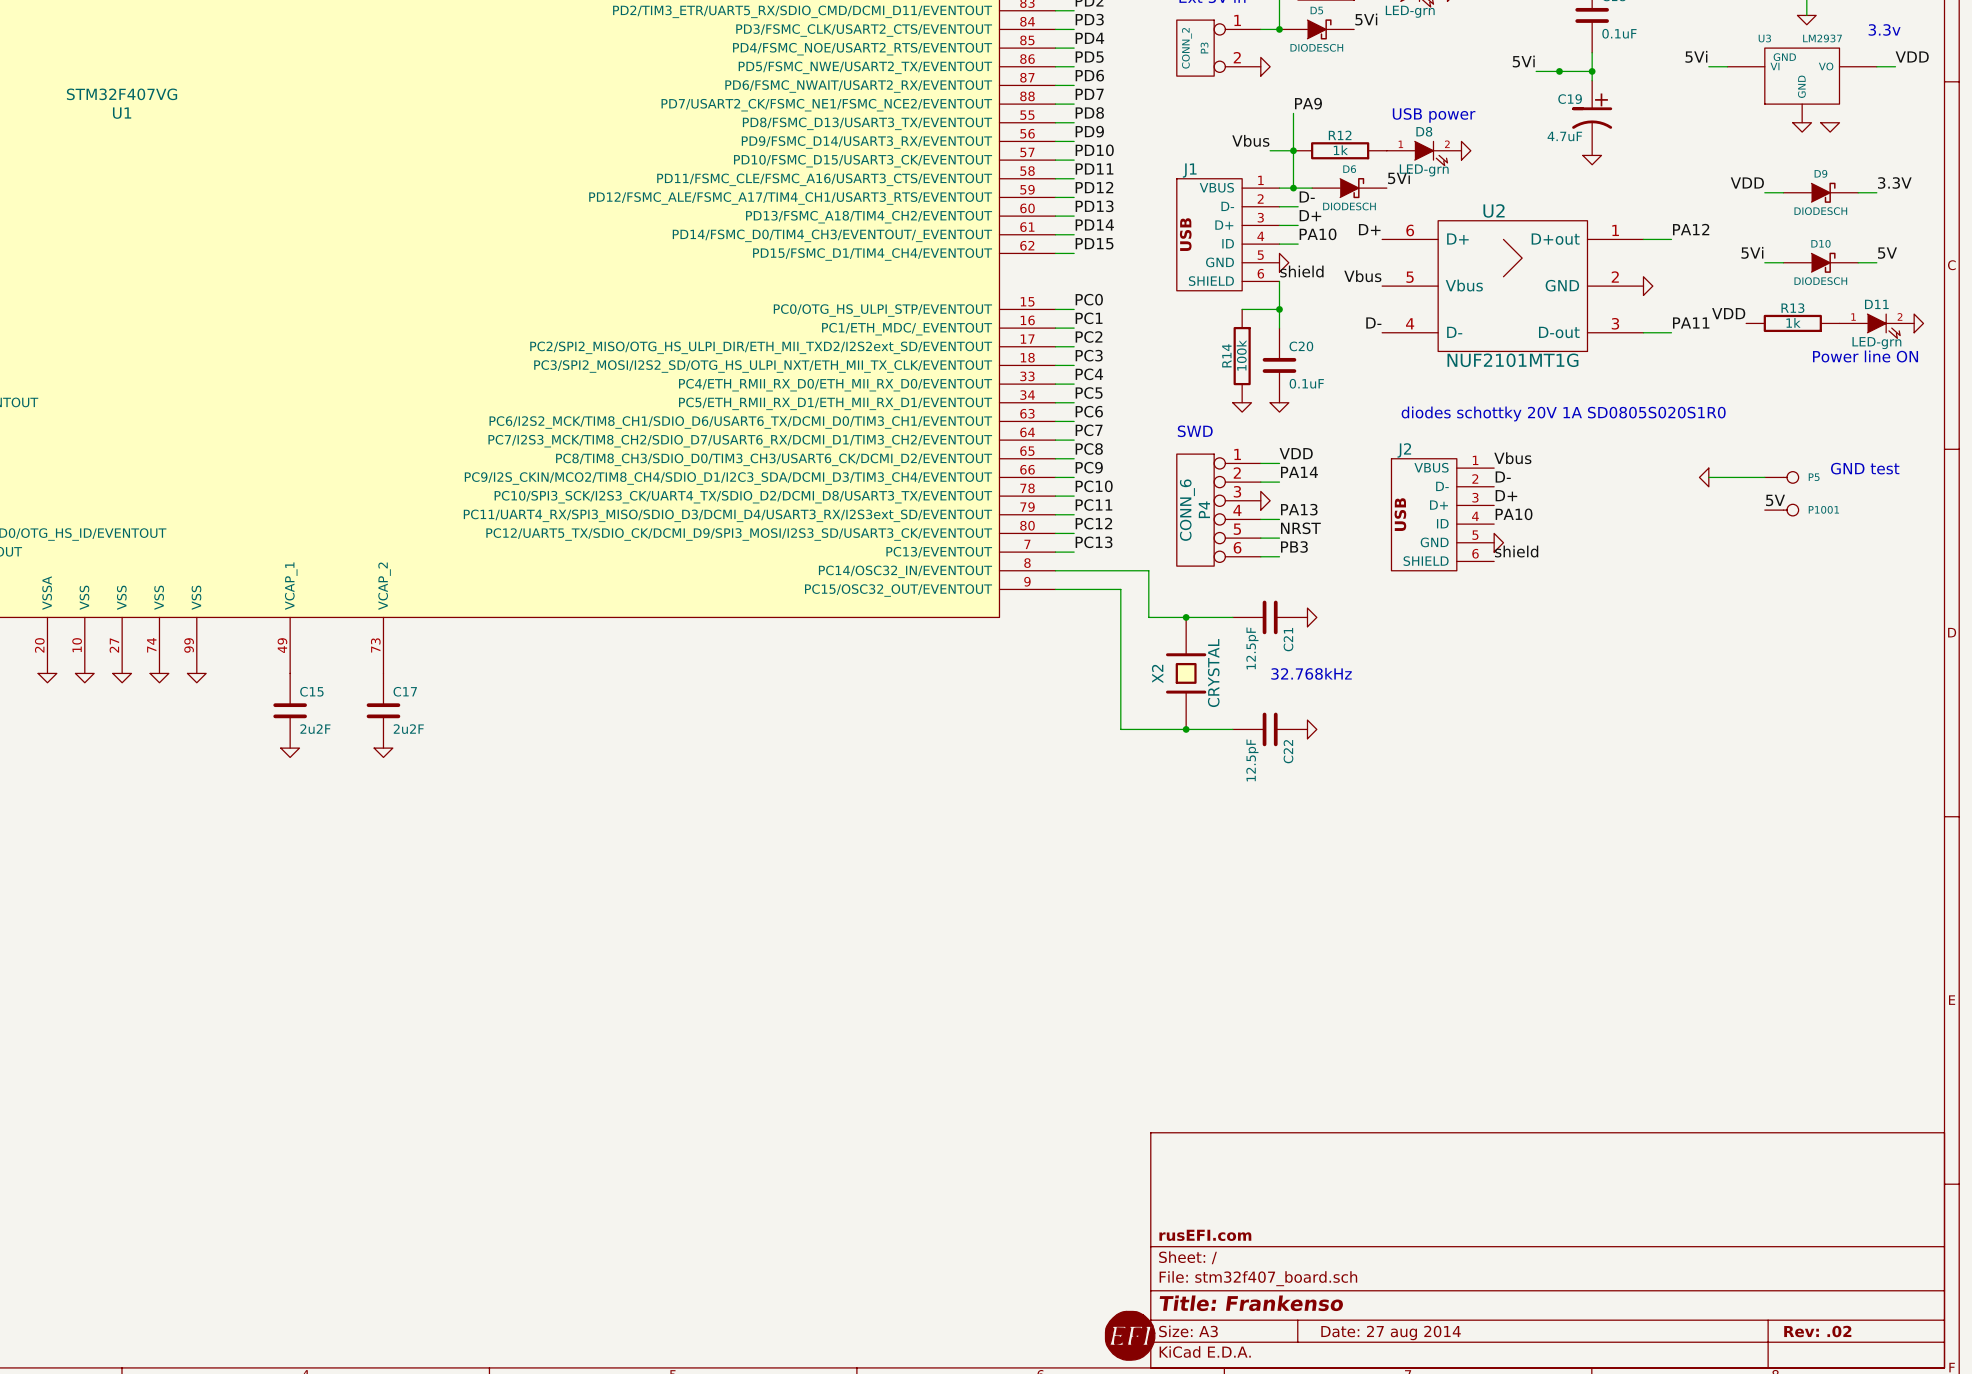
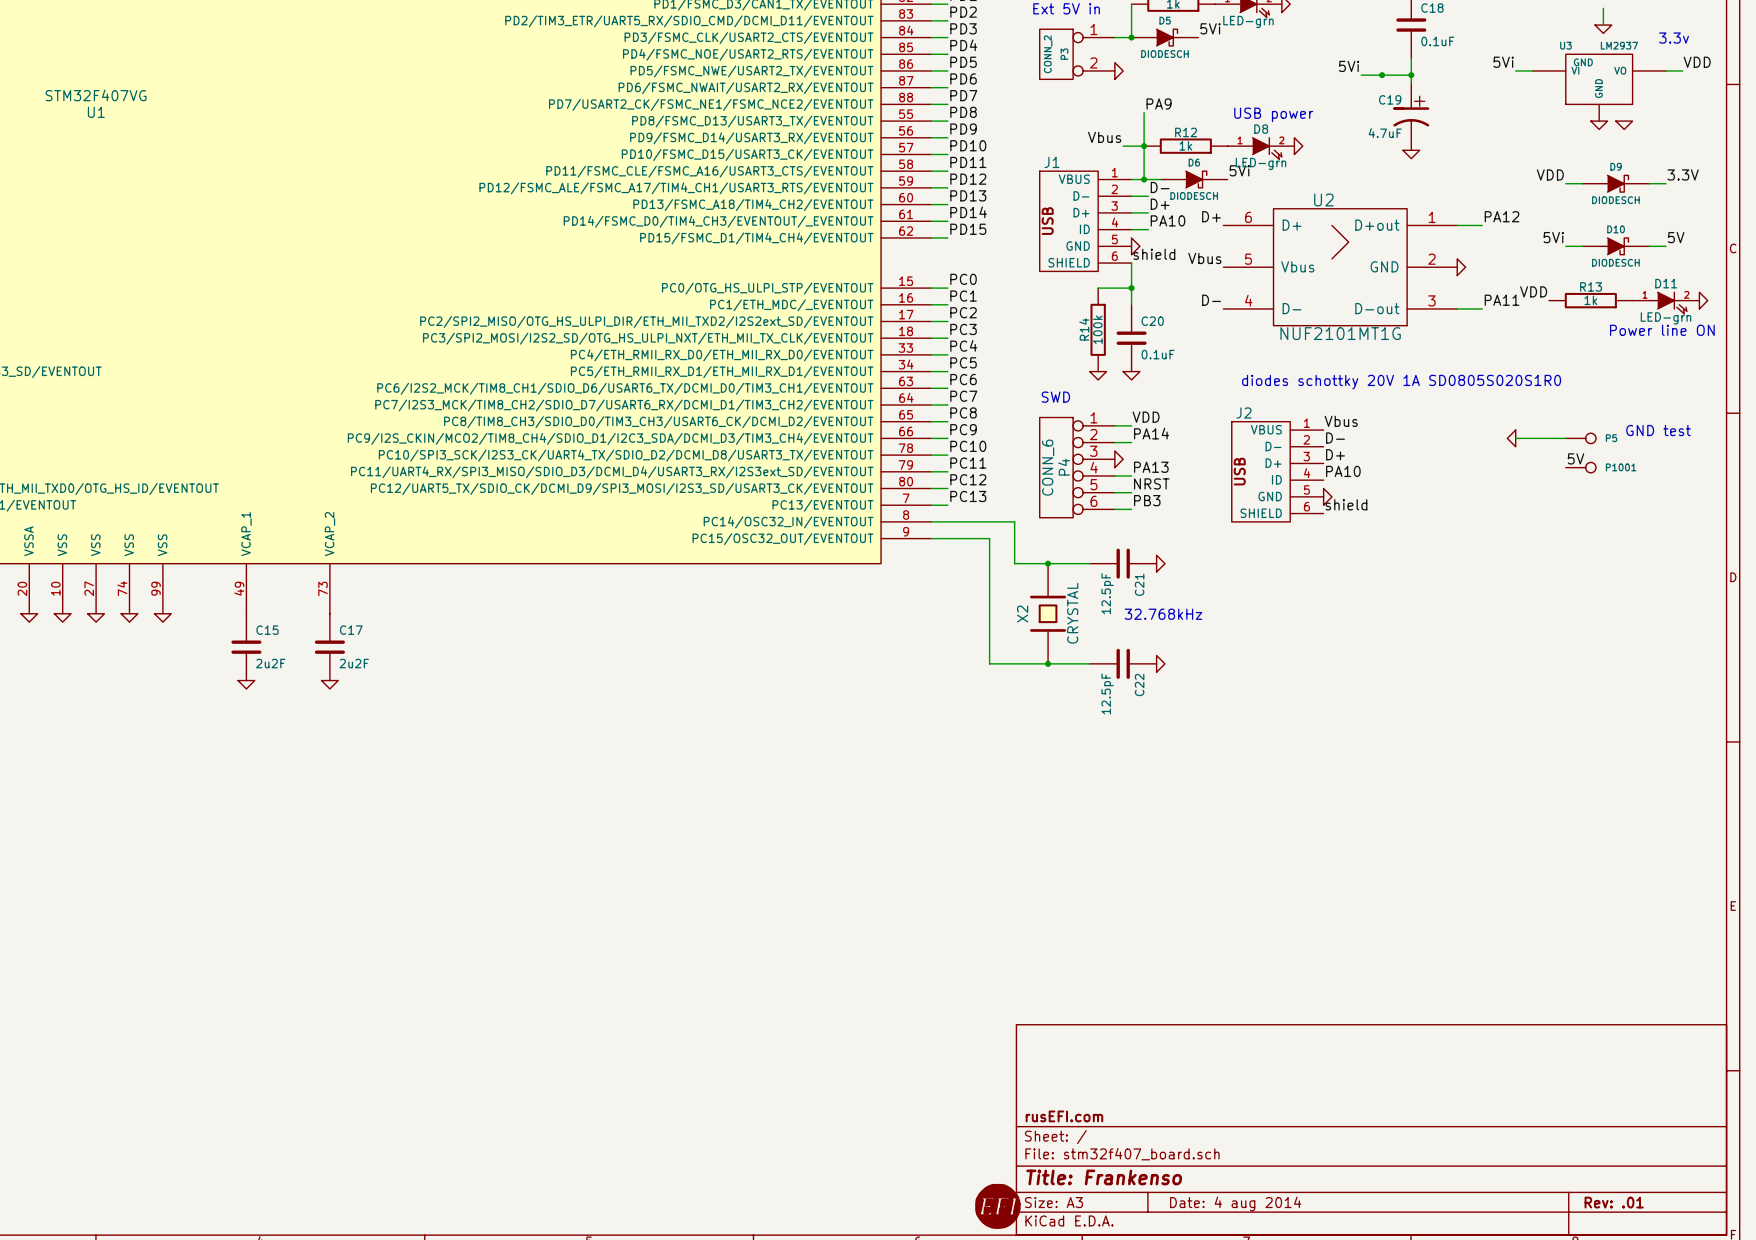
title block: Rev: .02 (1817, 1331) -> Rev: .01 (1614, 1202)
title block: Date: 27 aug 2014 (1391, 1332) -> Date: 4 aug 2014 (1235, 1203)

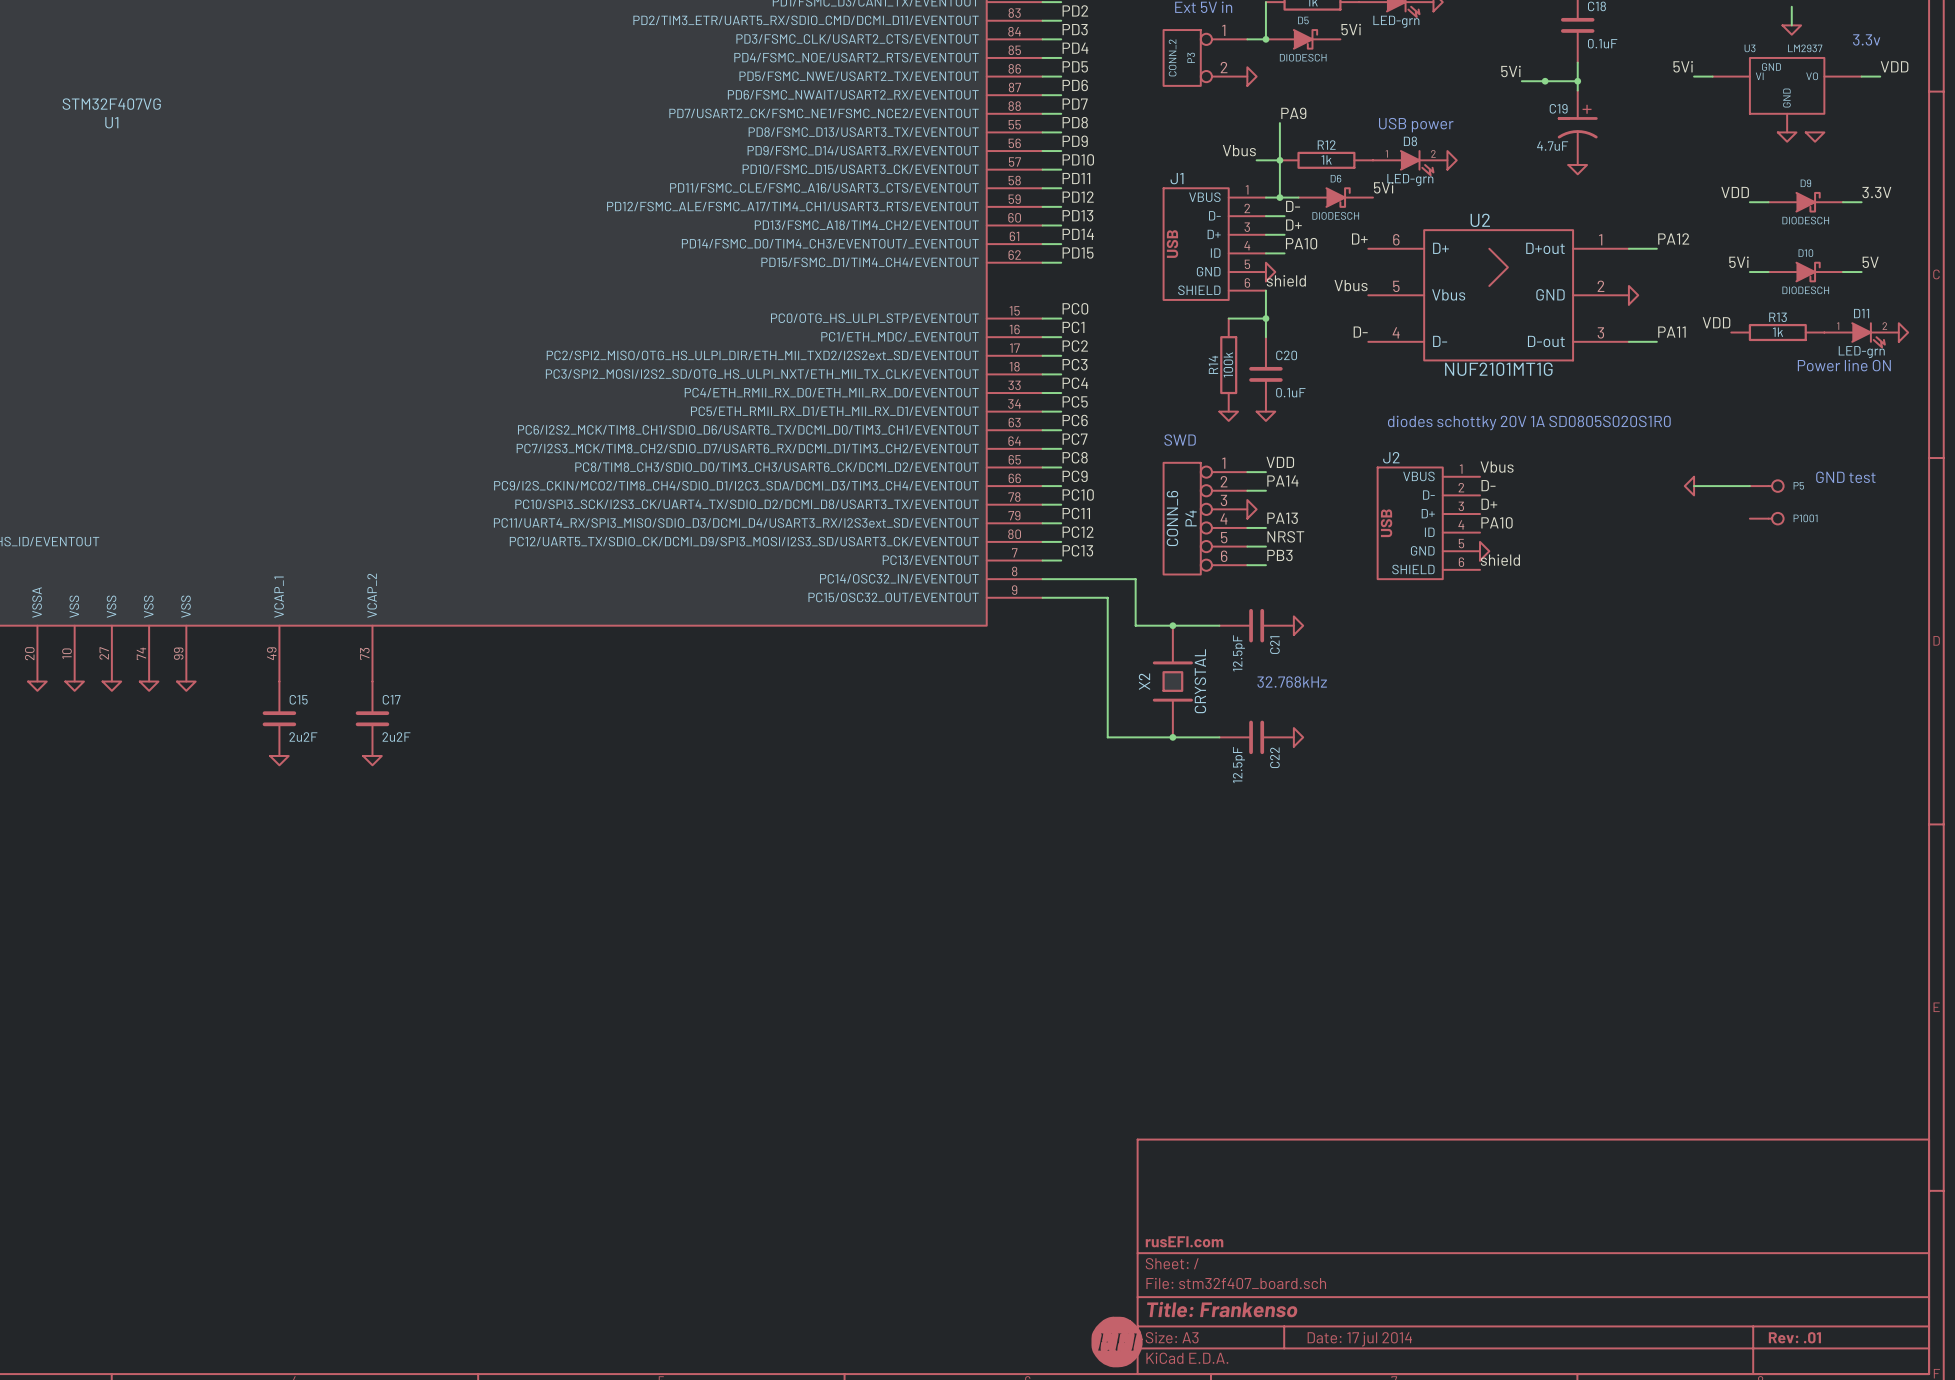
label: 5V (1575, 458) -> none
title block: Date: 4 aug 2014 (1235, 1203) -> Date: 17 jul 2014 (1359, 1339)

